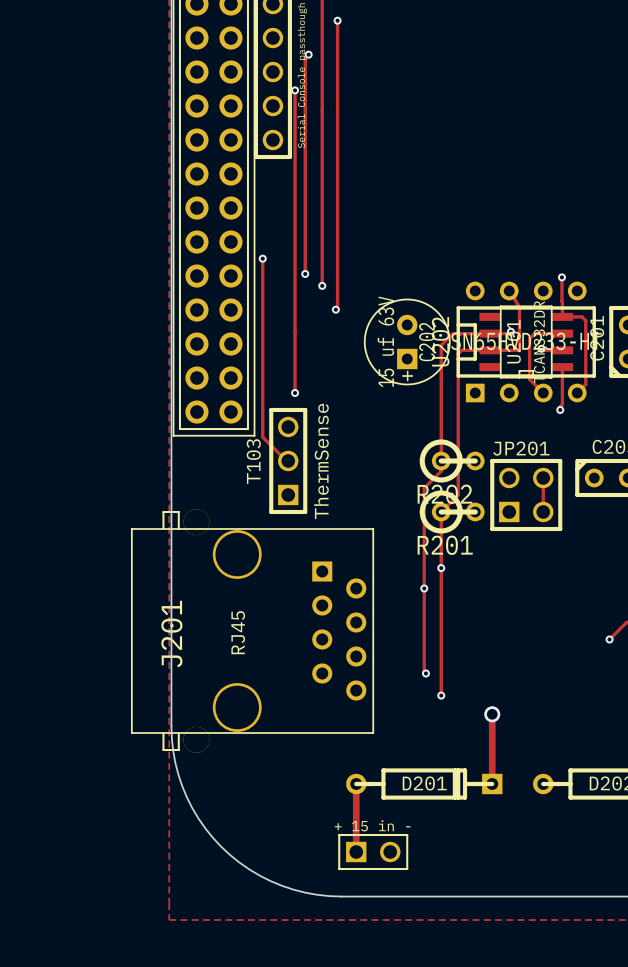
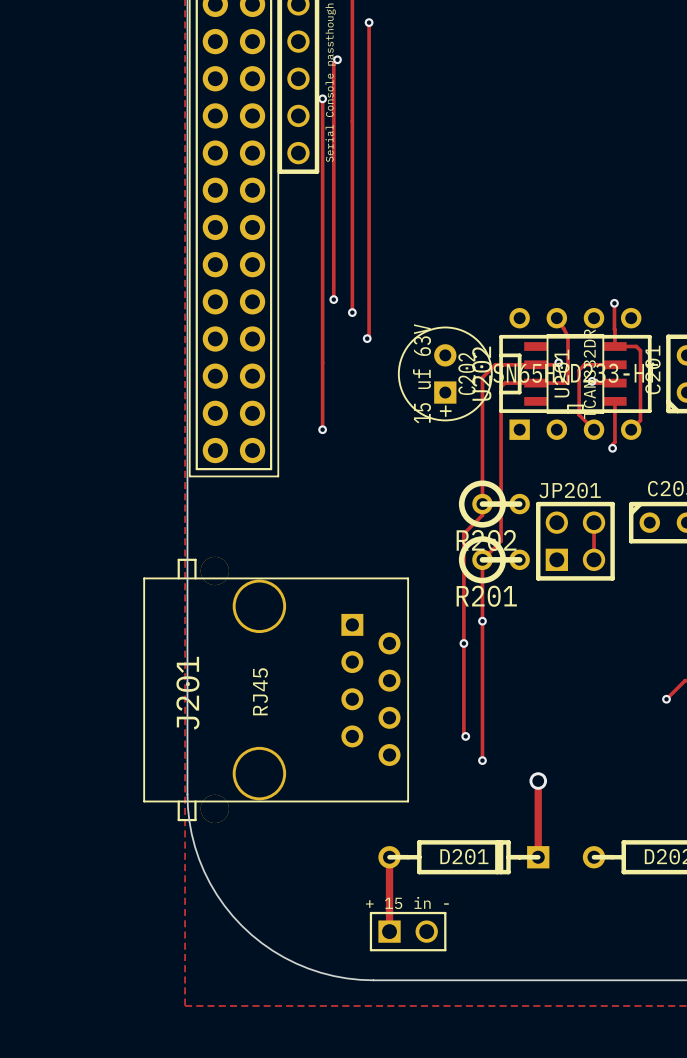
track: (262, 258) (262, 437) (288, 460) -> none
via: (262, 258) -> none
T103: ThermSense (288, 460) -> none

